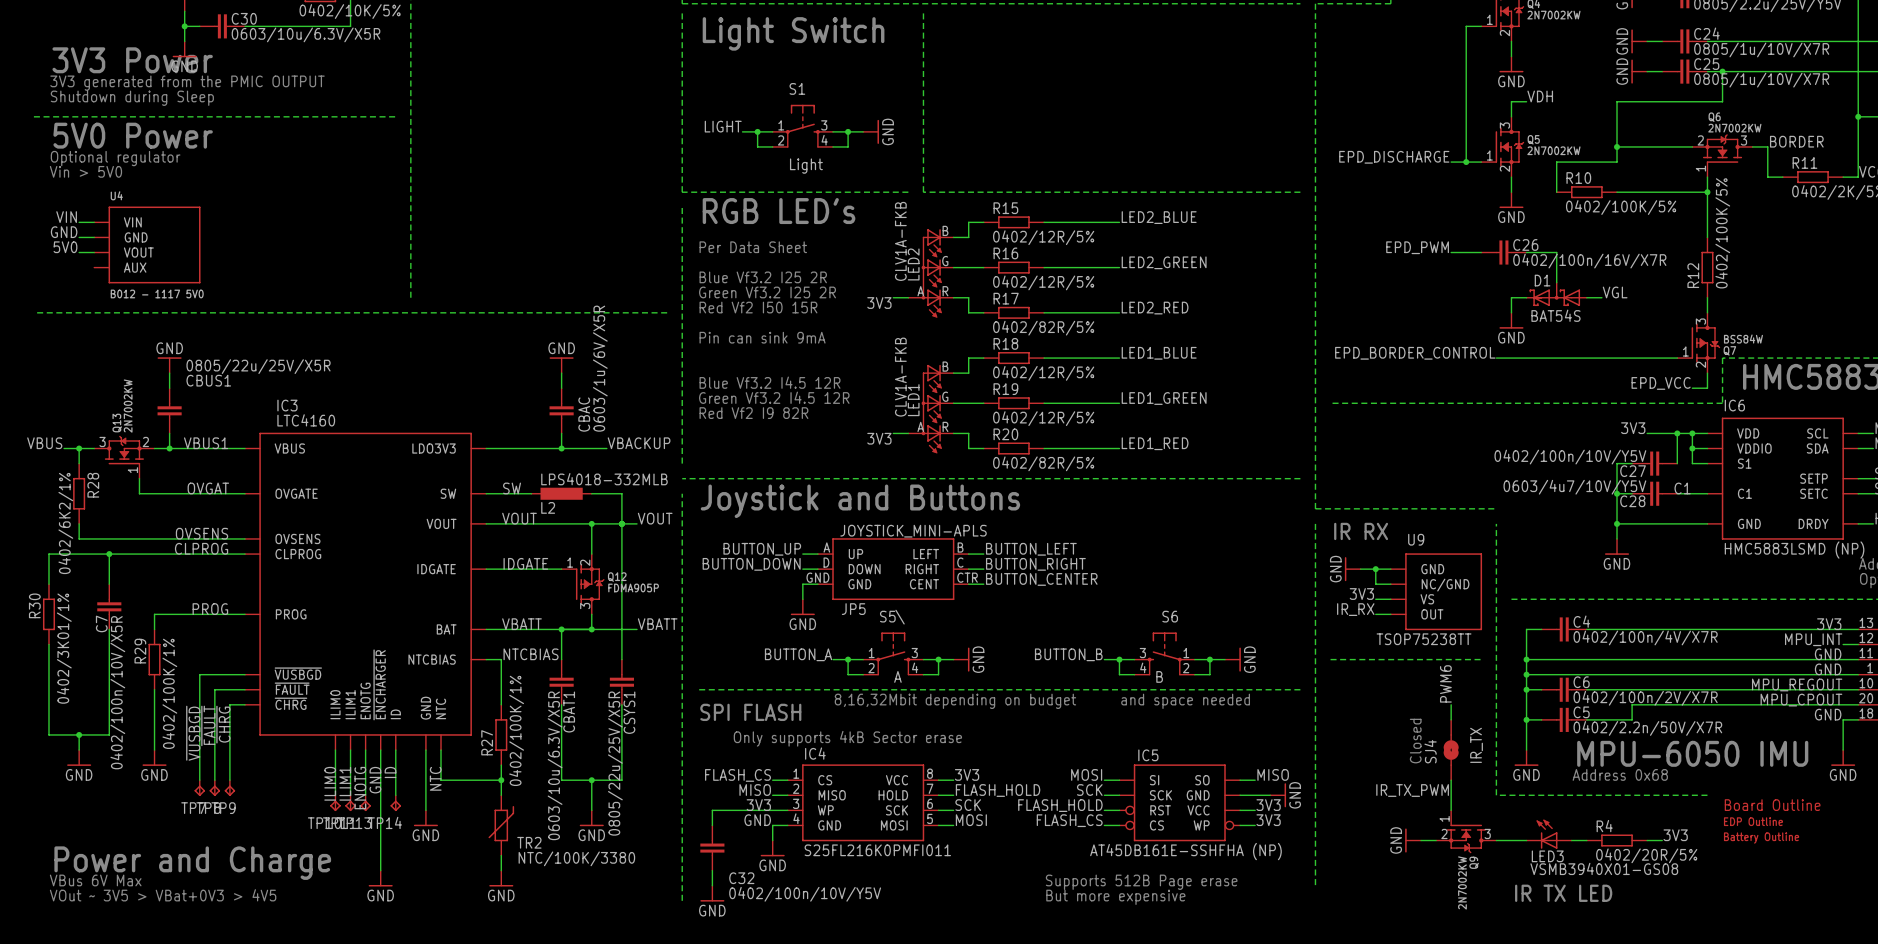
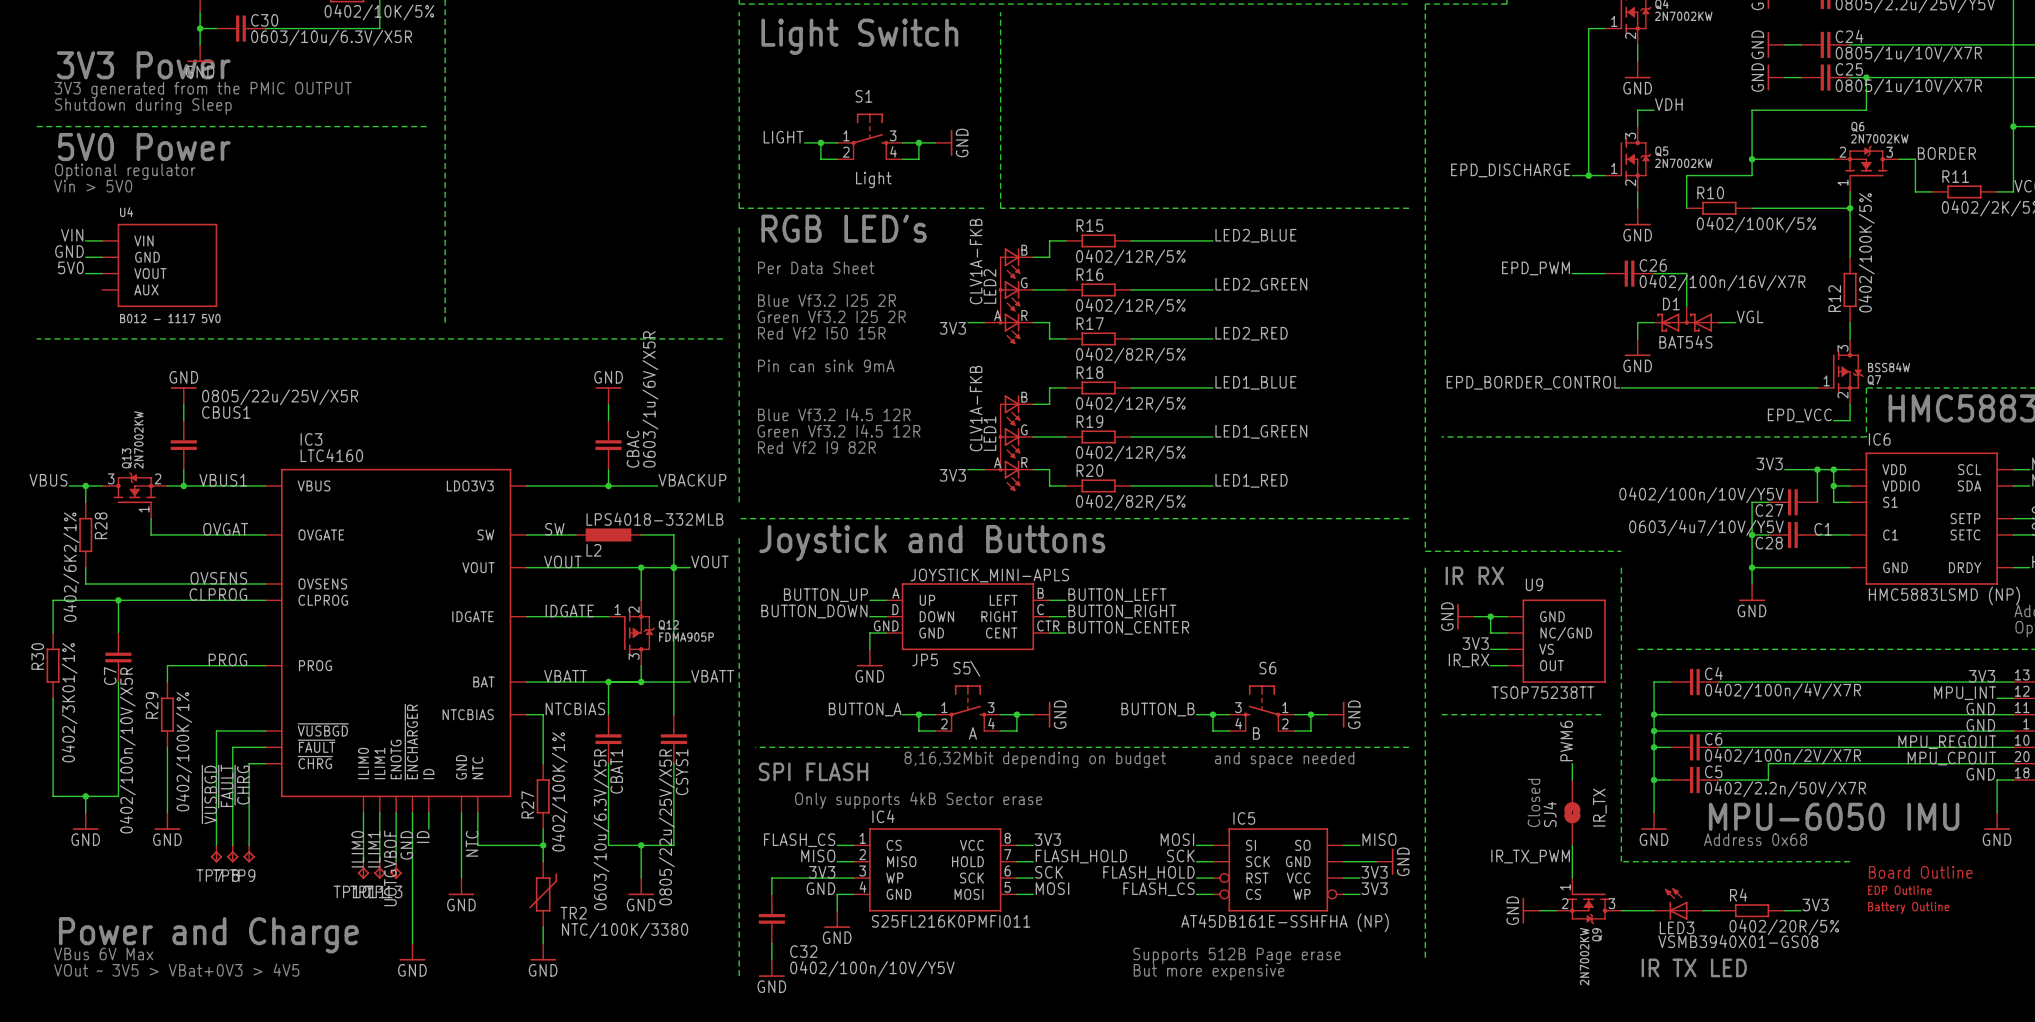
wire: (395, 765) (395, 795) -> none
label: ENOTG (360, 788) -> UOTGVBOF (390, 868)
TP14: (395, 803) -> none

